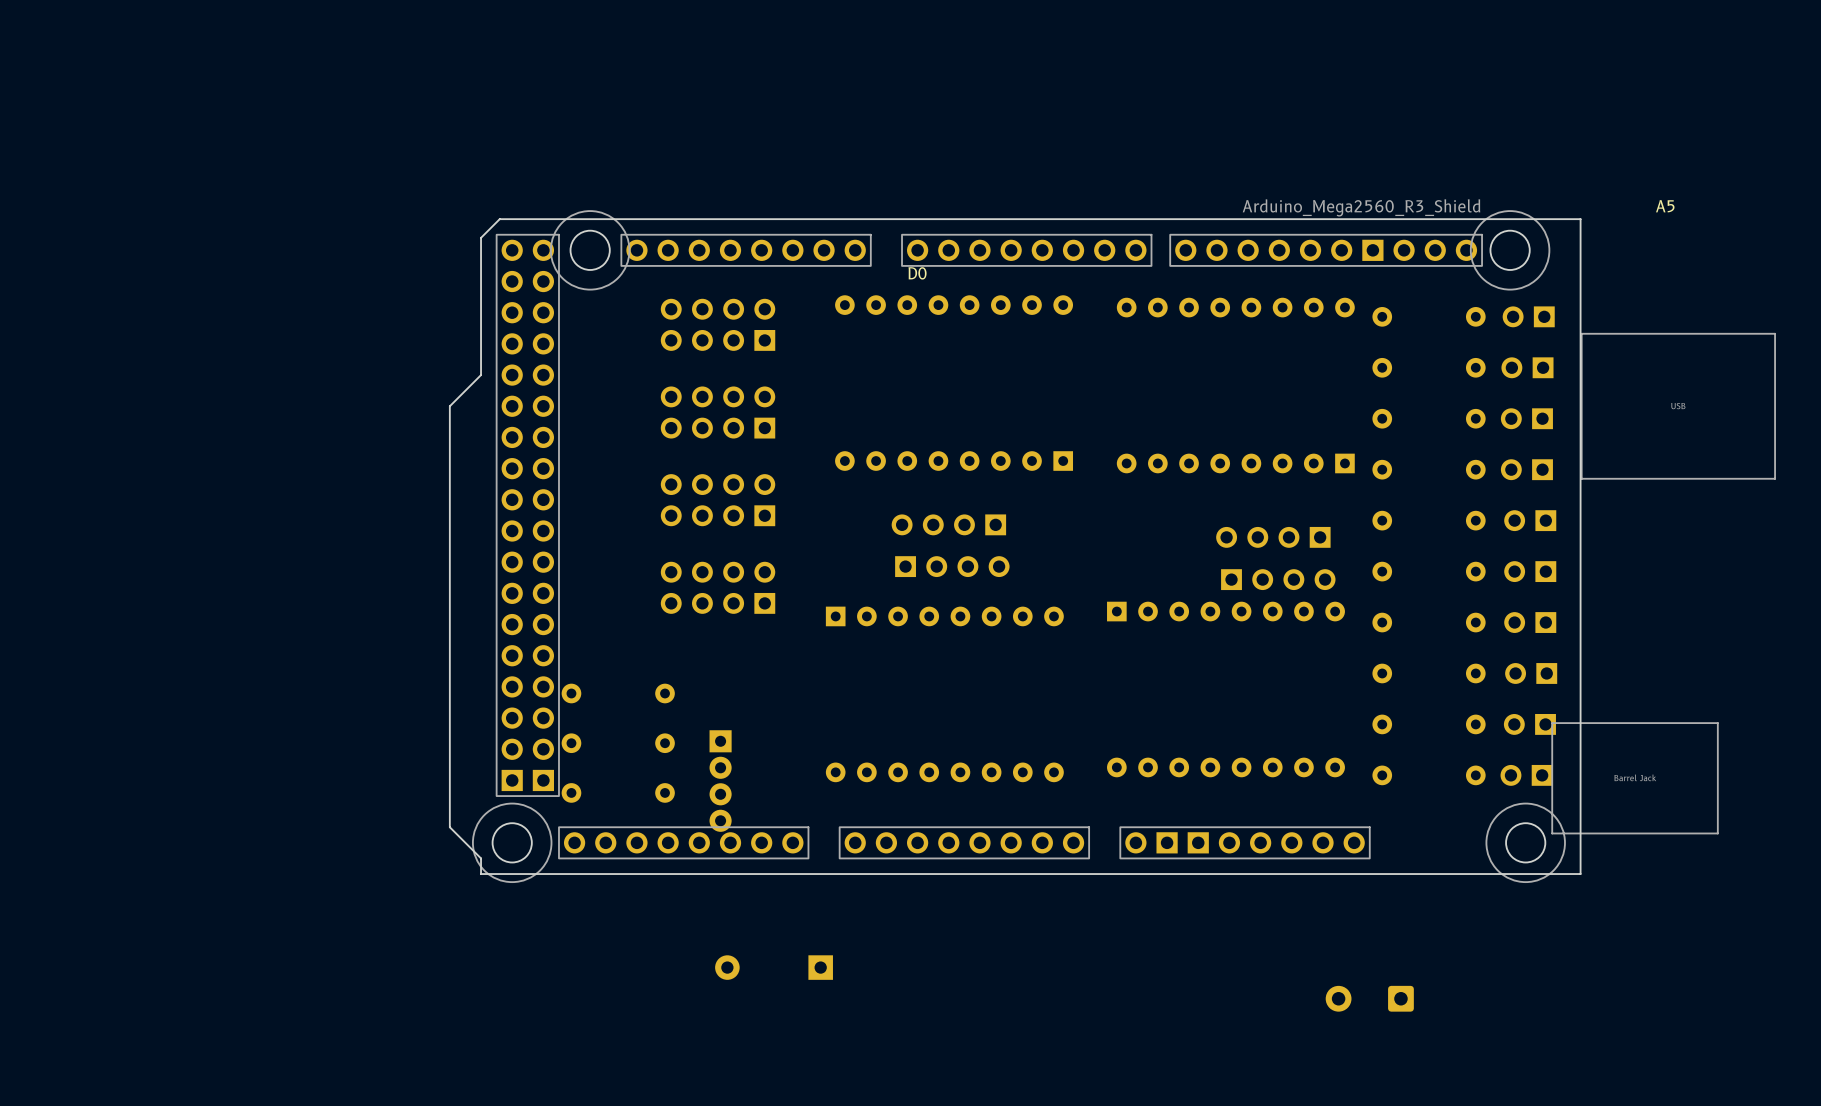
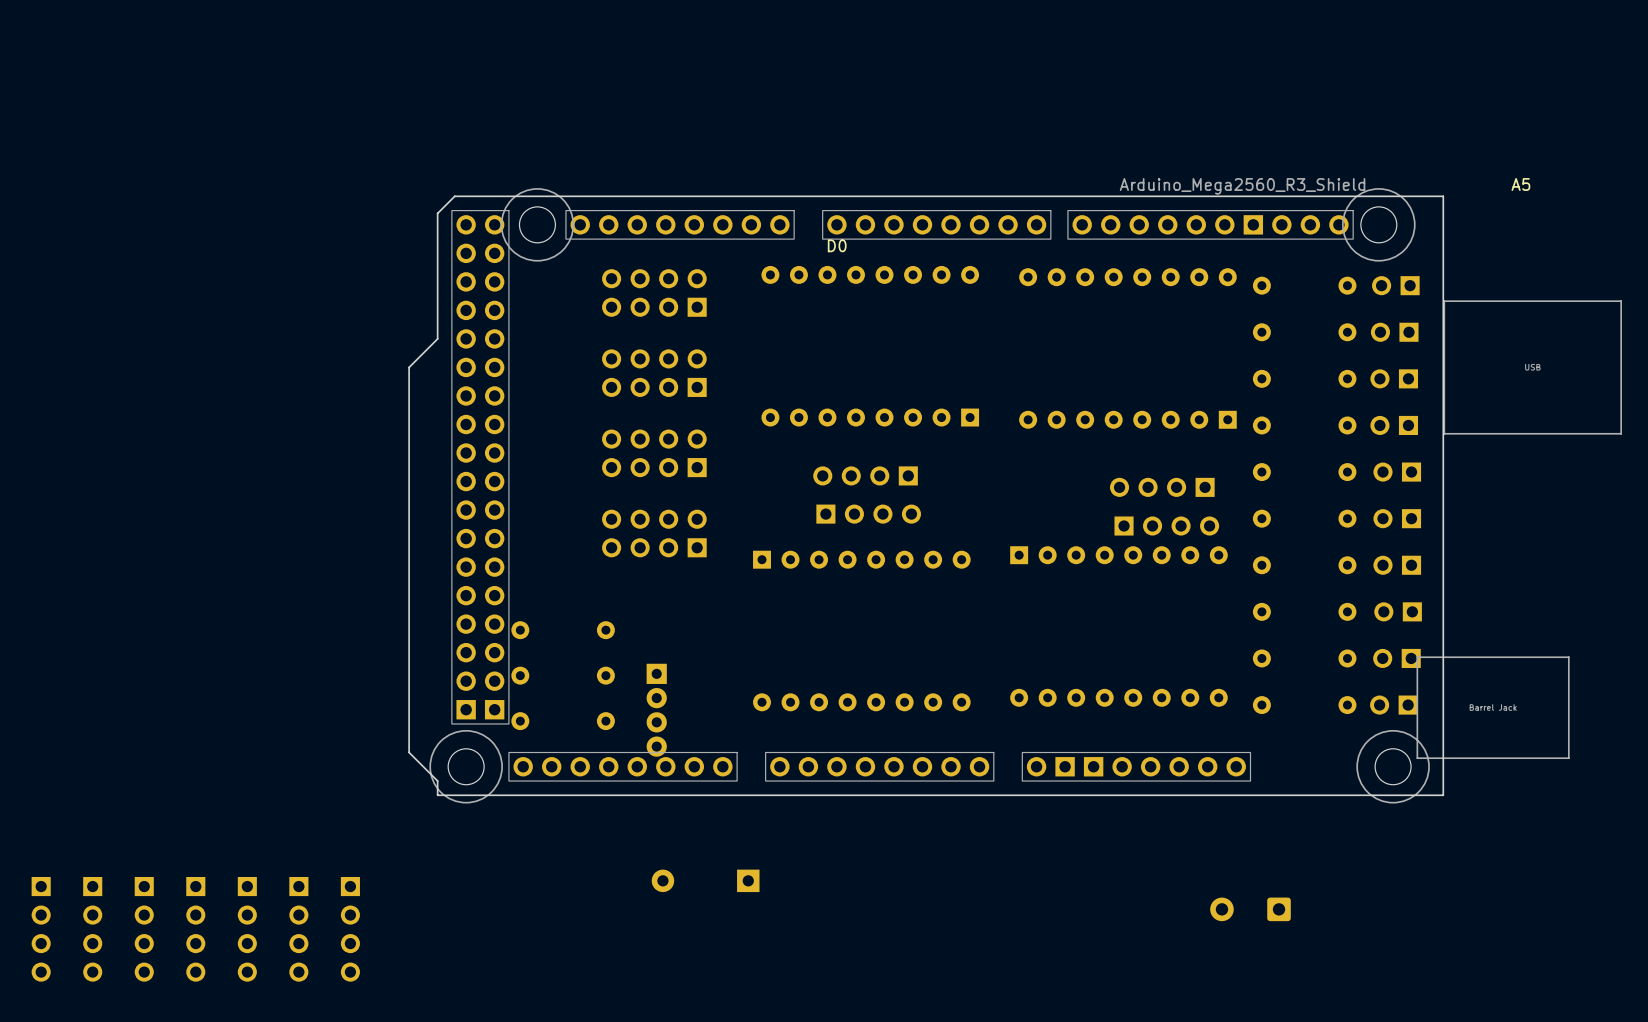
part: none -> (41, 929)
part: none -> (92, 929)
part: none -> (144, 929)
part: none -> (195, 929)
part: none -> (247, 929)
part: none -> (298, 929)
part: none -> (350, 929)

